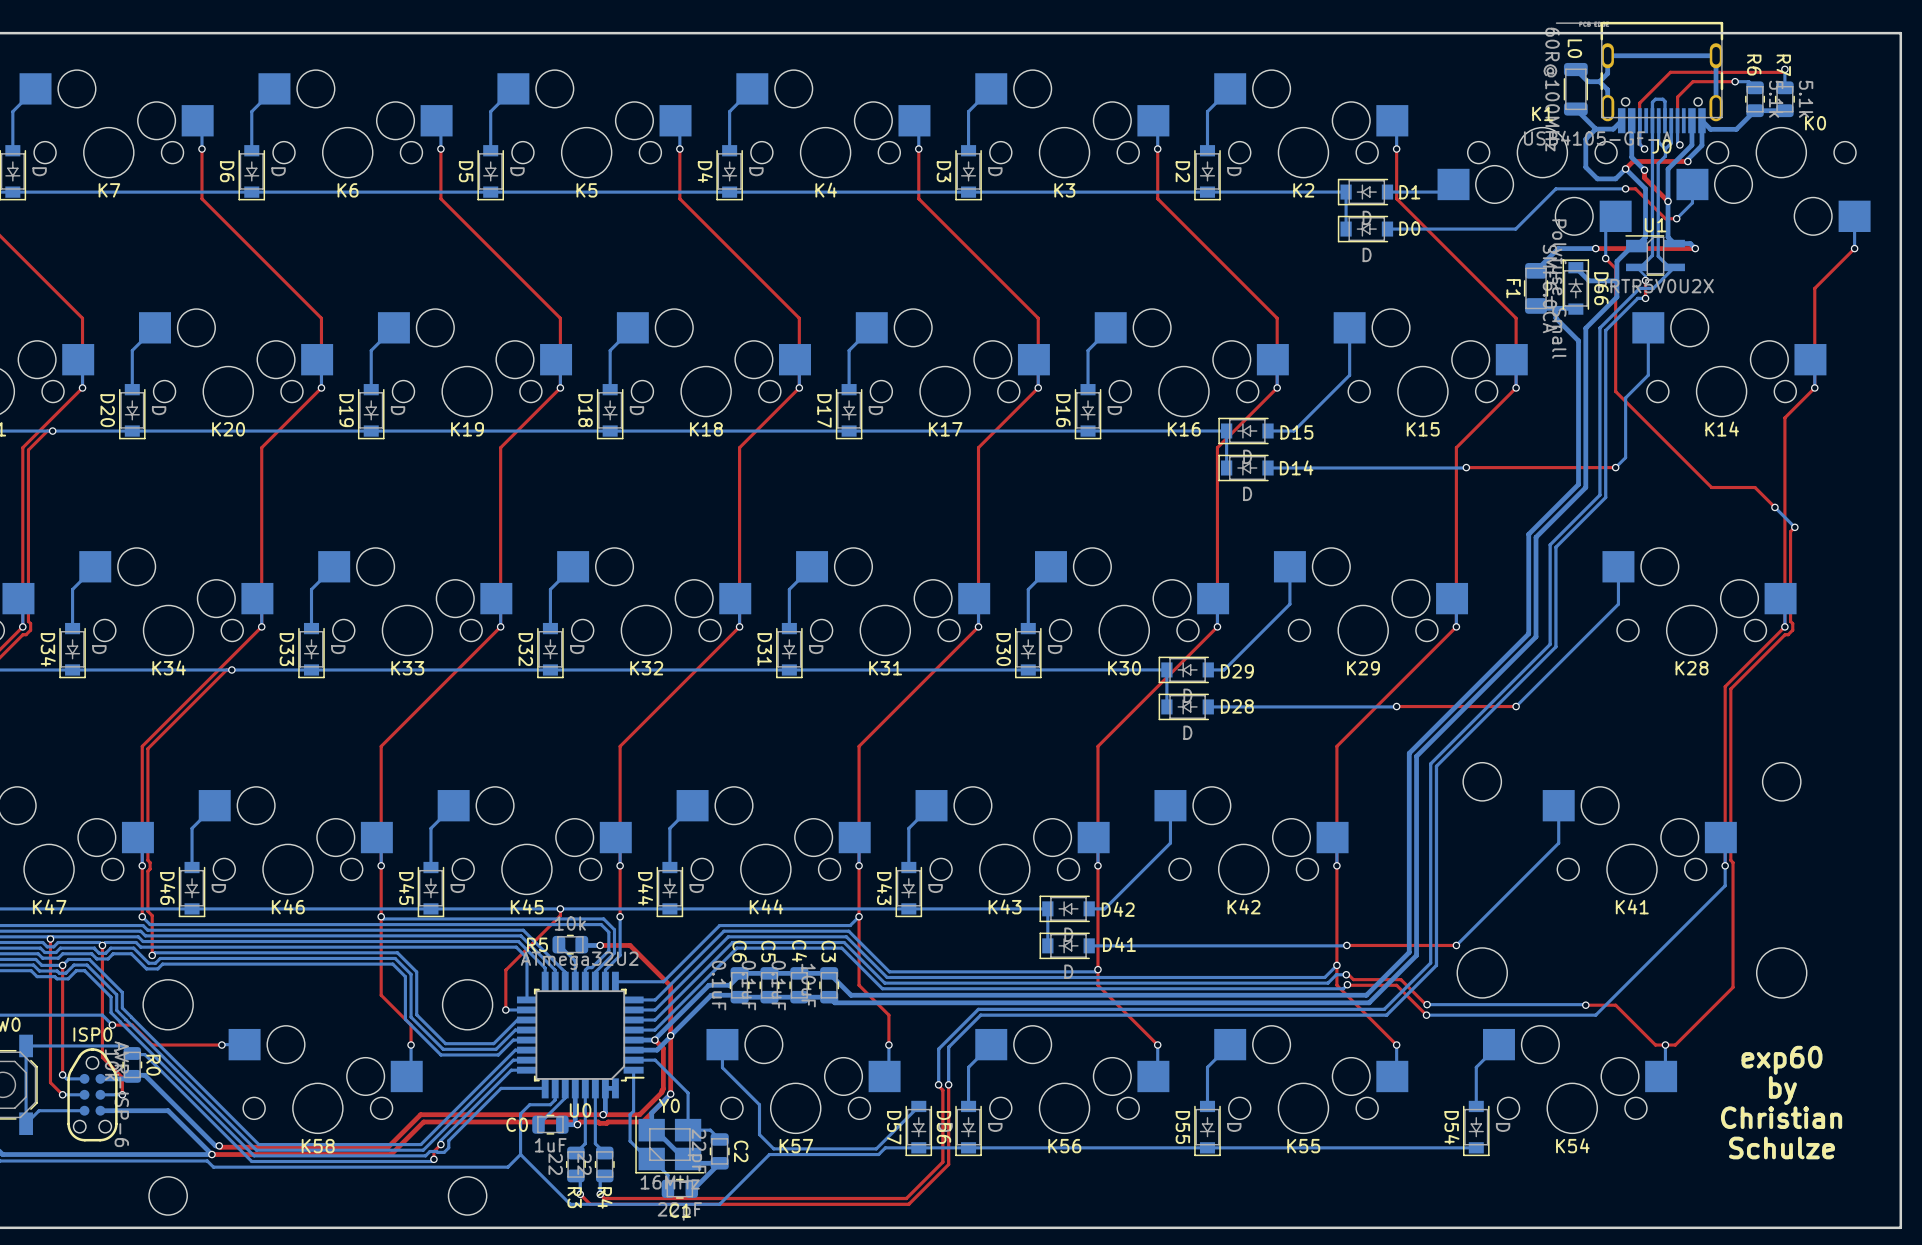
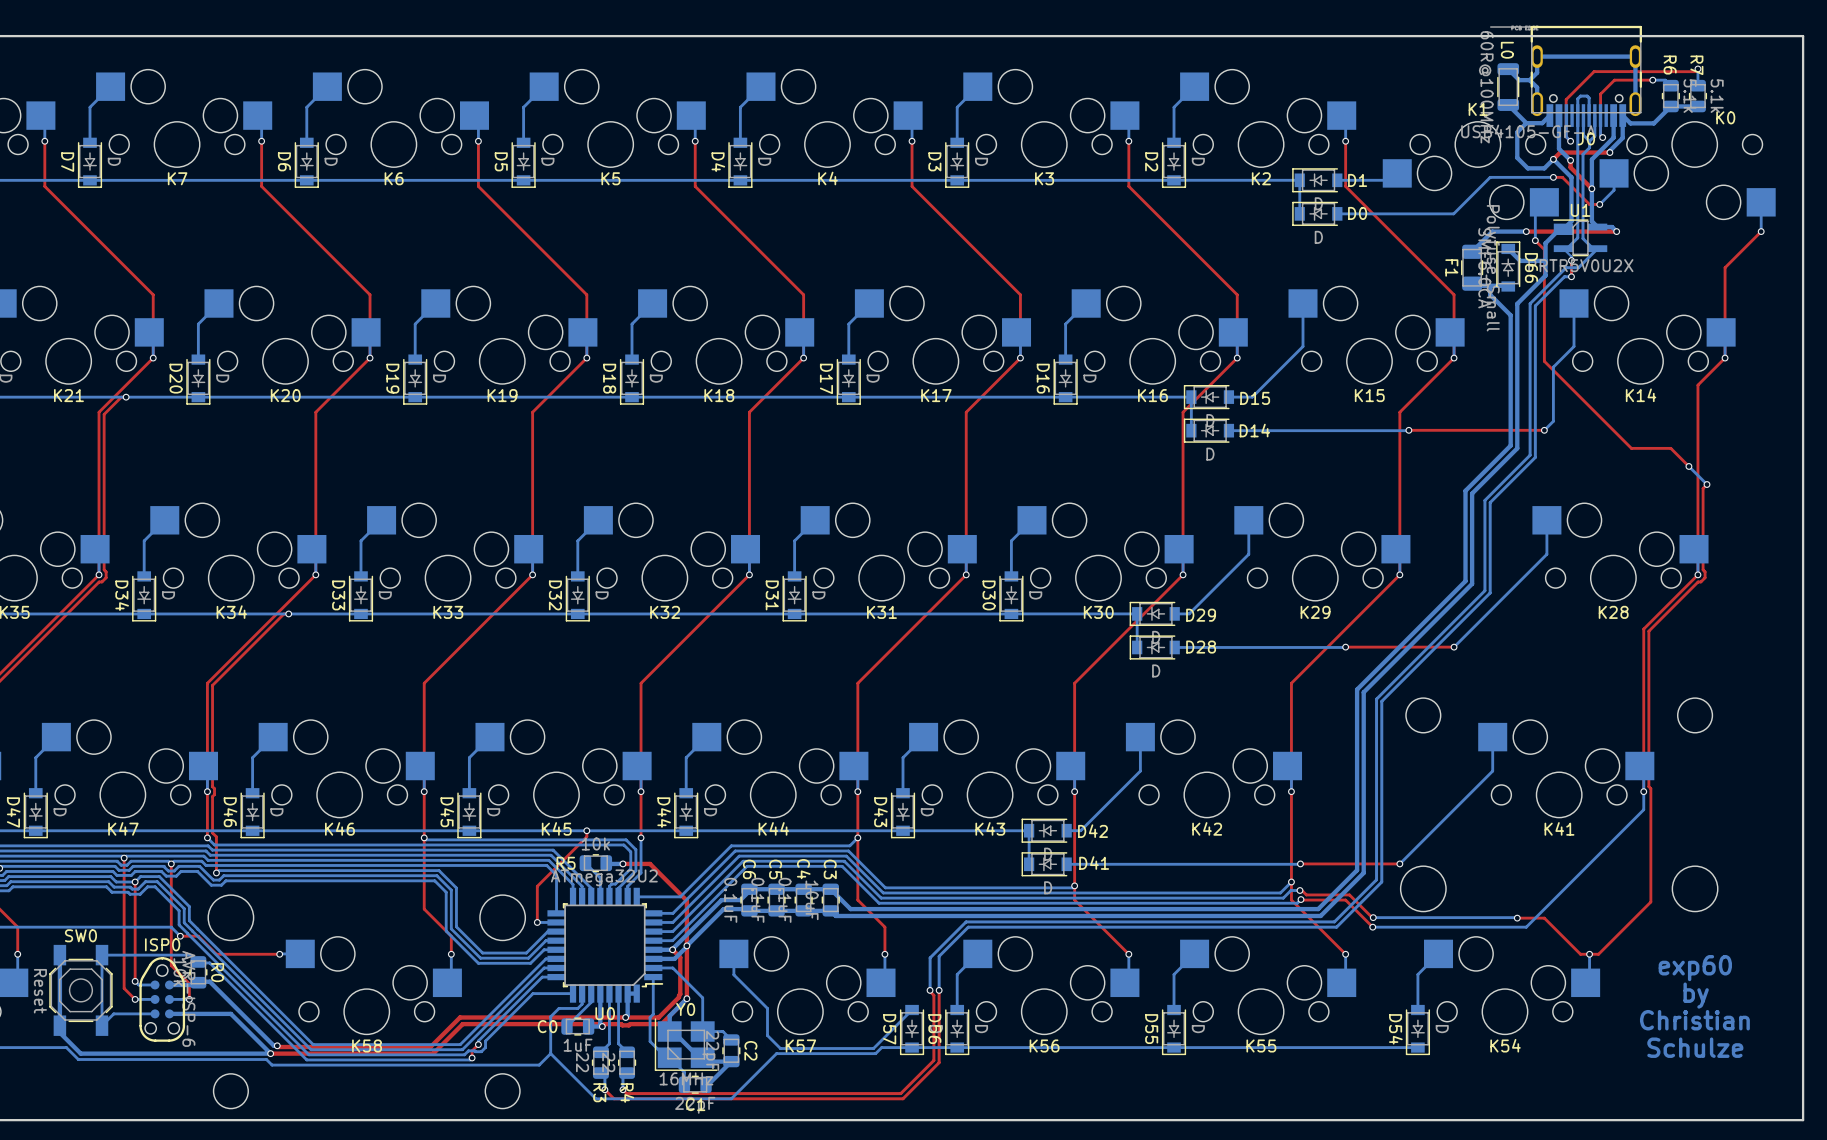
text: exp60 (1782, 1060) -> none
text: by (1782, 1090) -> none
text: Christian (1781, 1117) -> none
text: Schulze (1782, 1147) -> none

